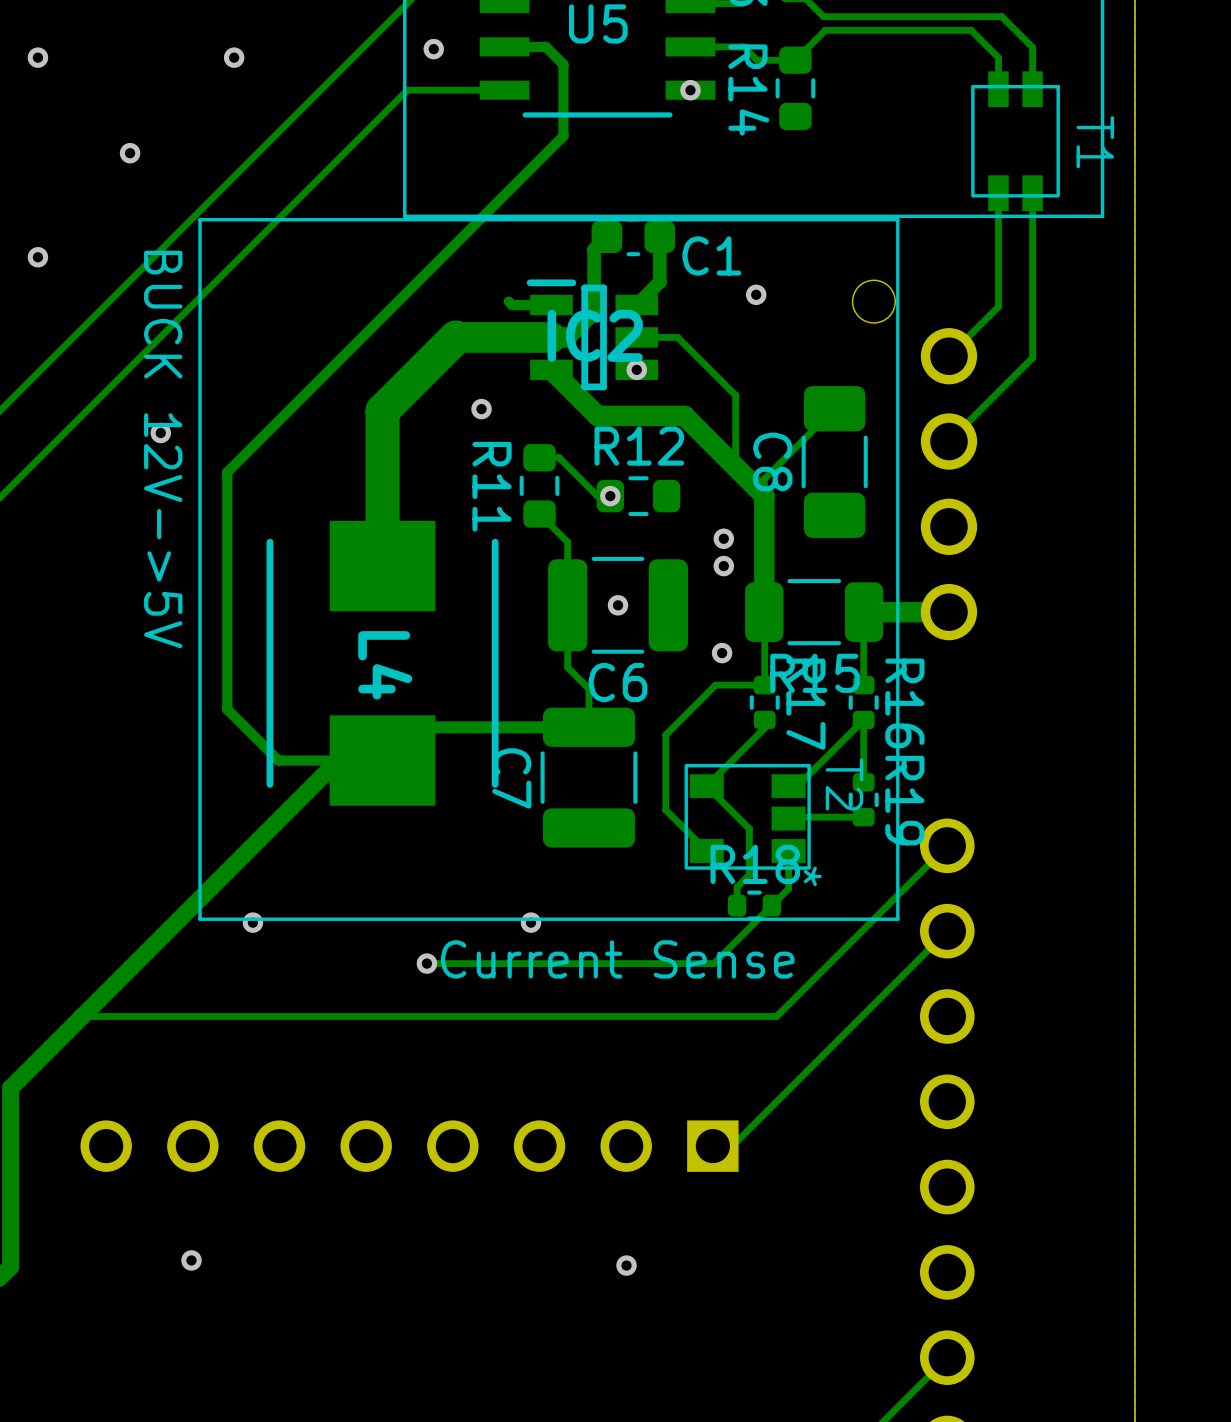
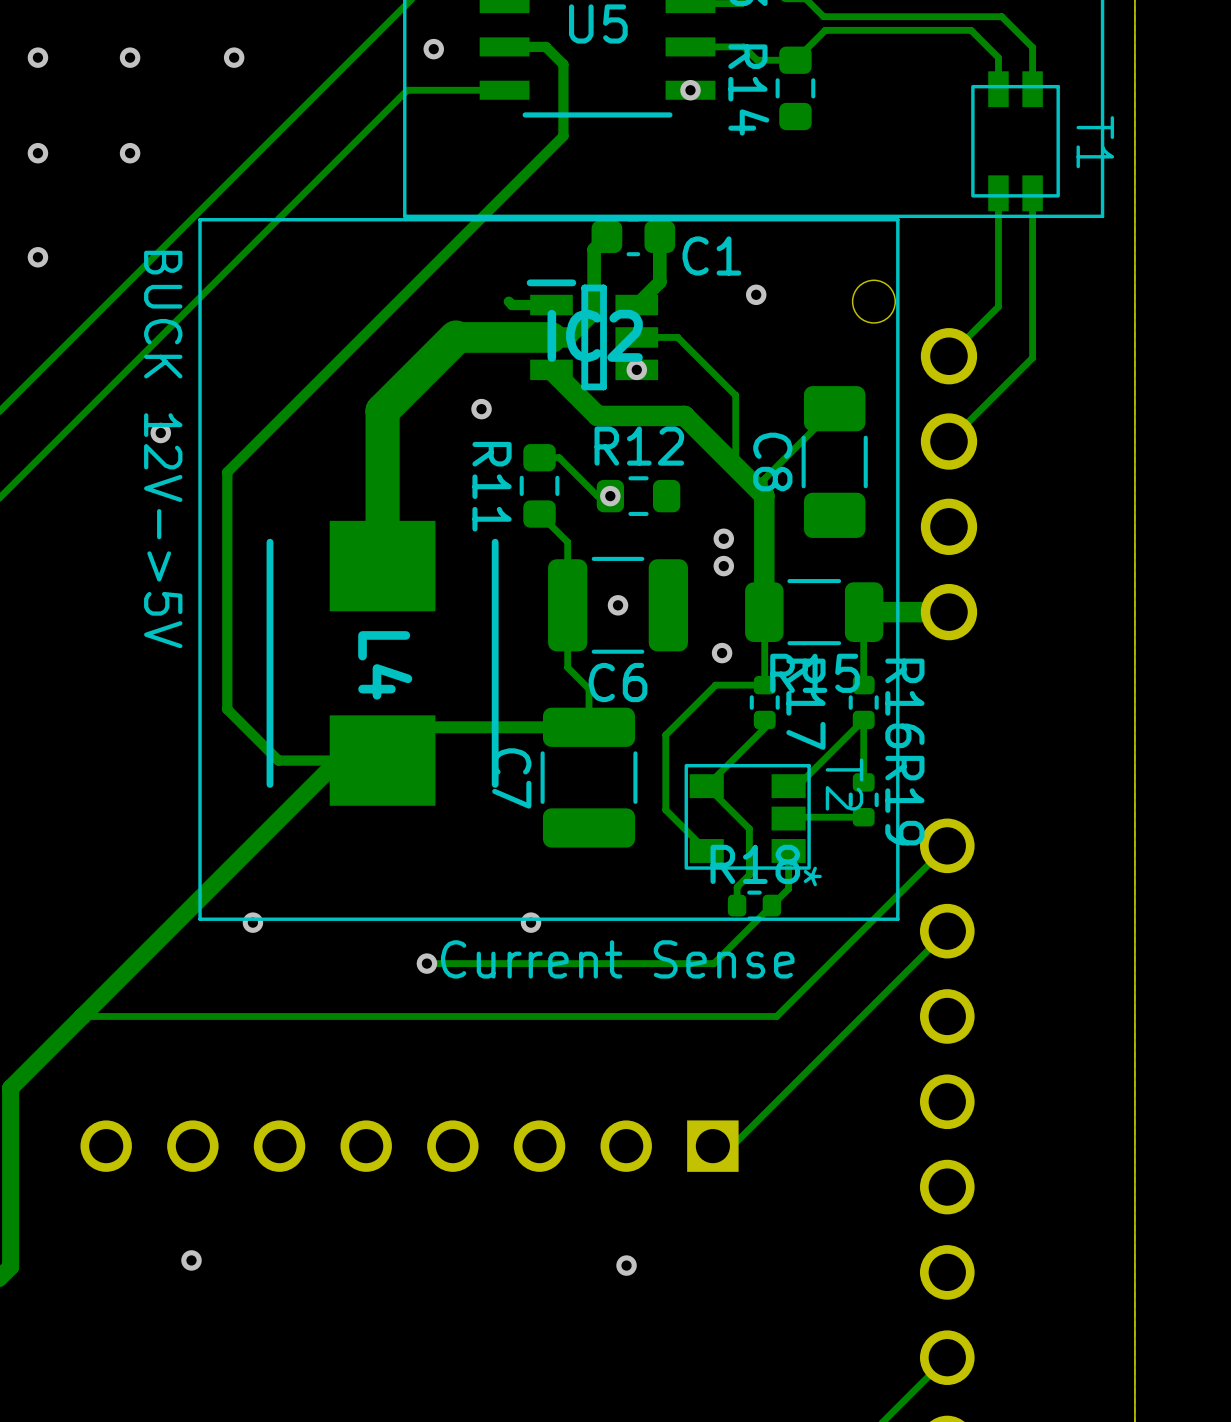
via: none -> (130, 57)
via: none -> (37, 153)

